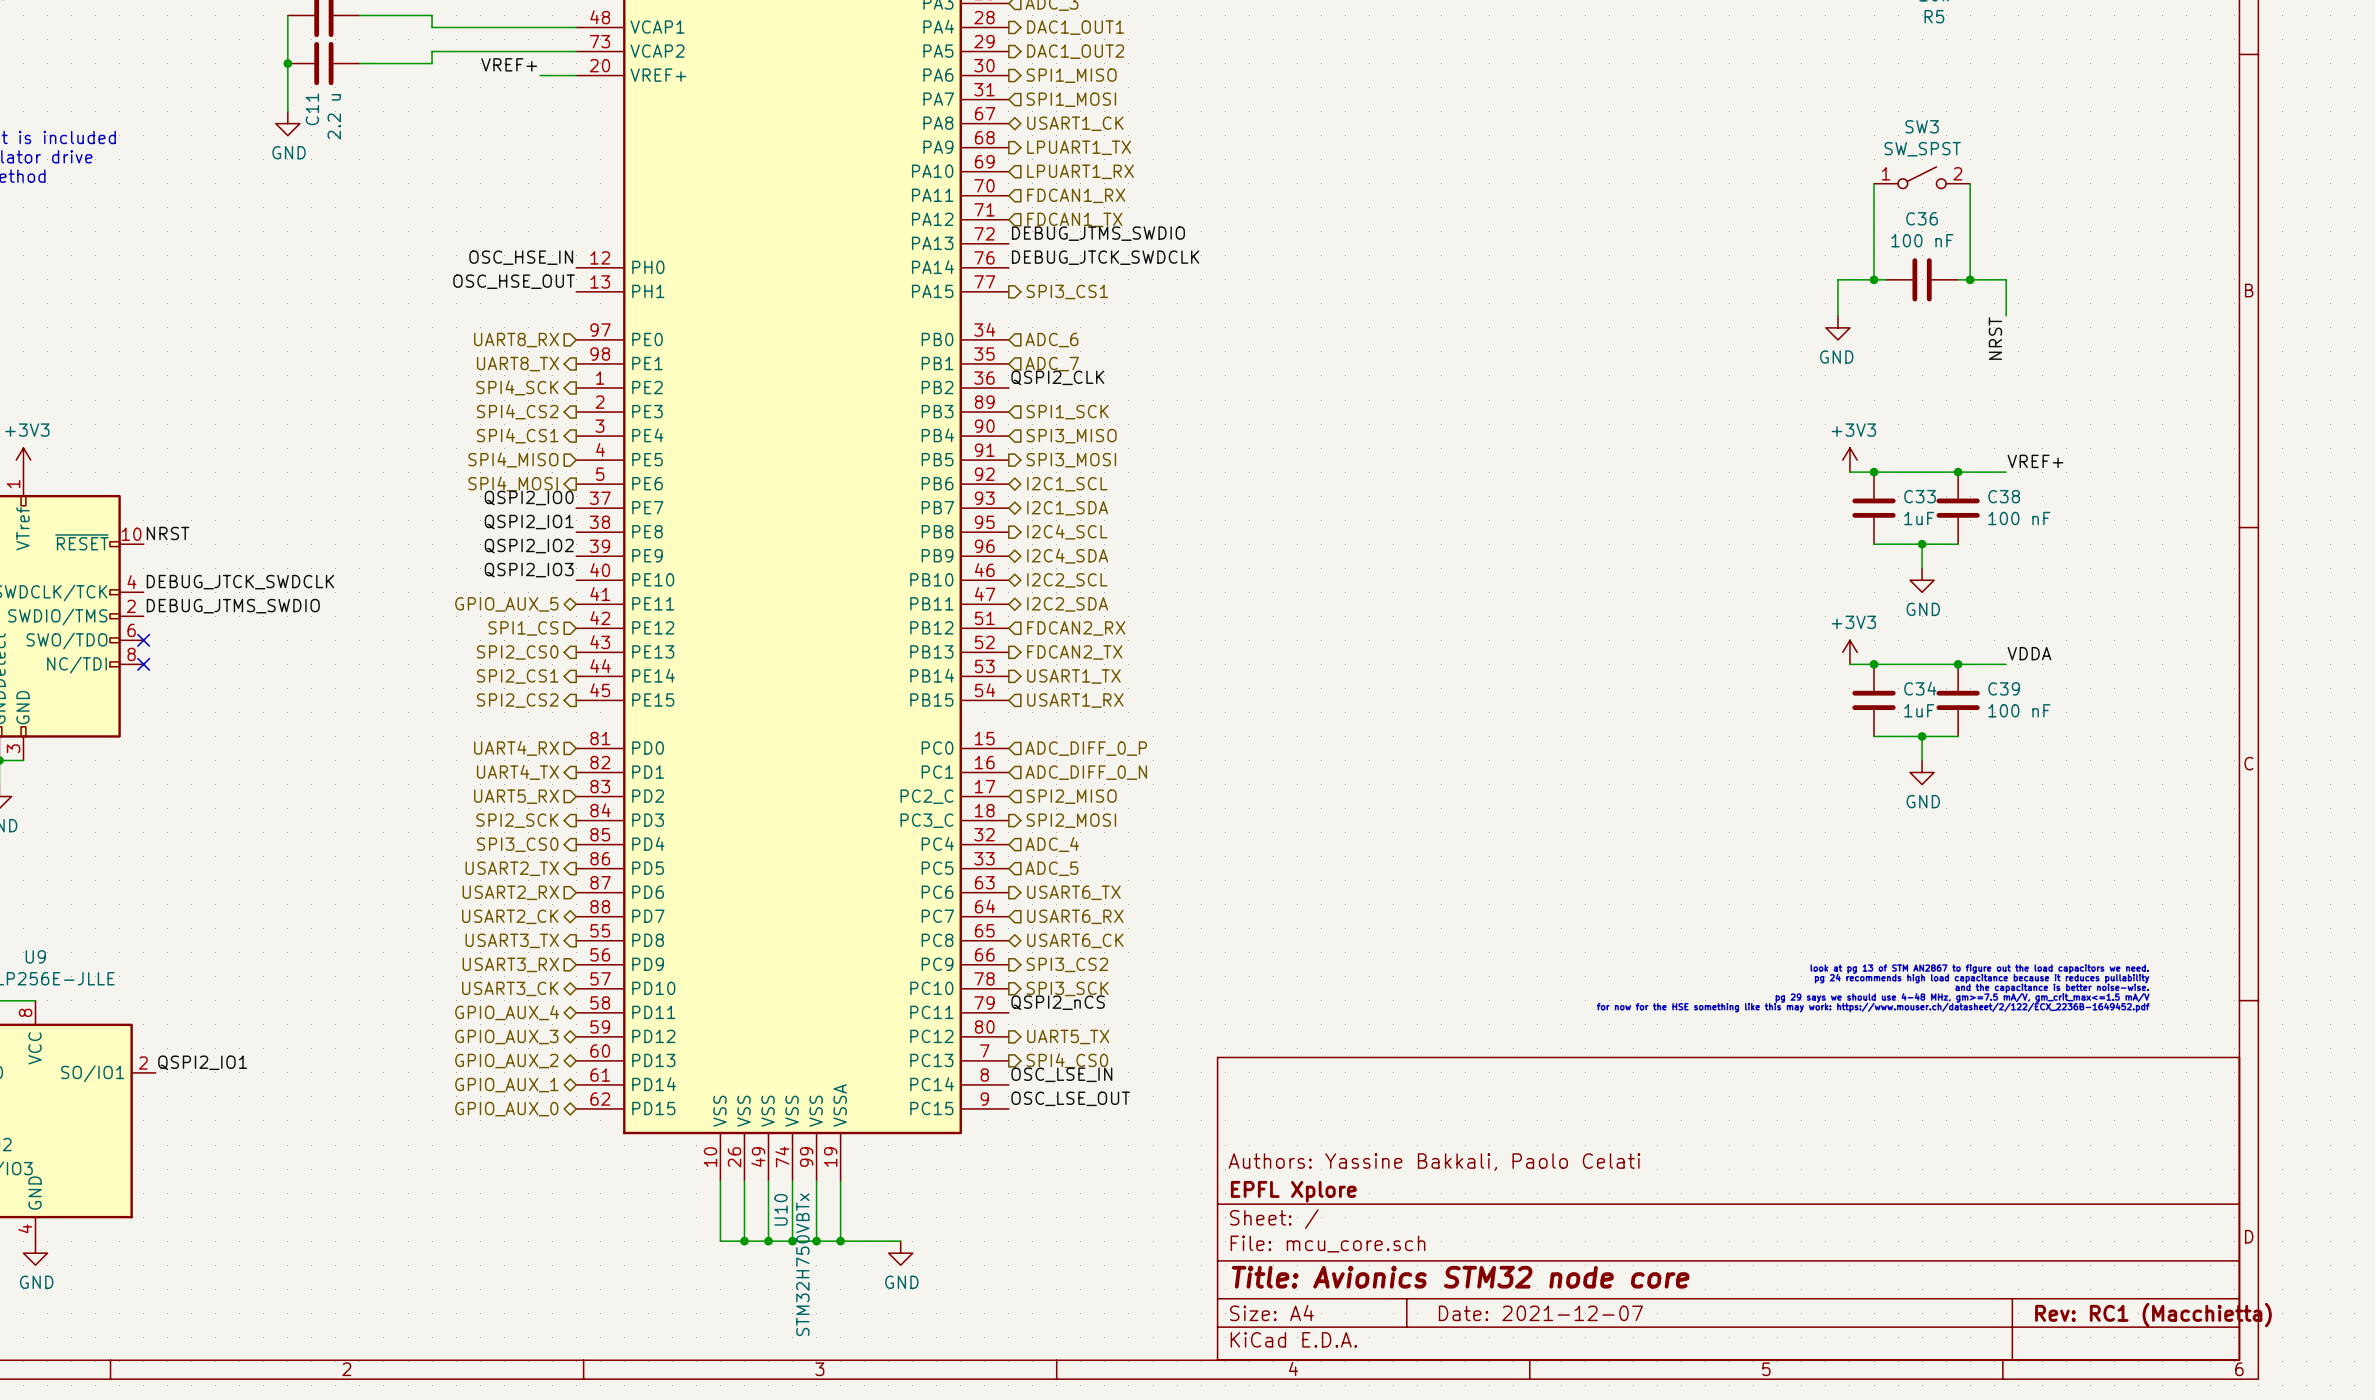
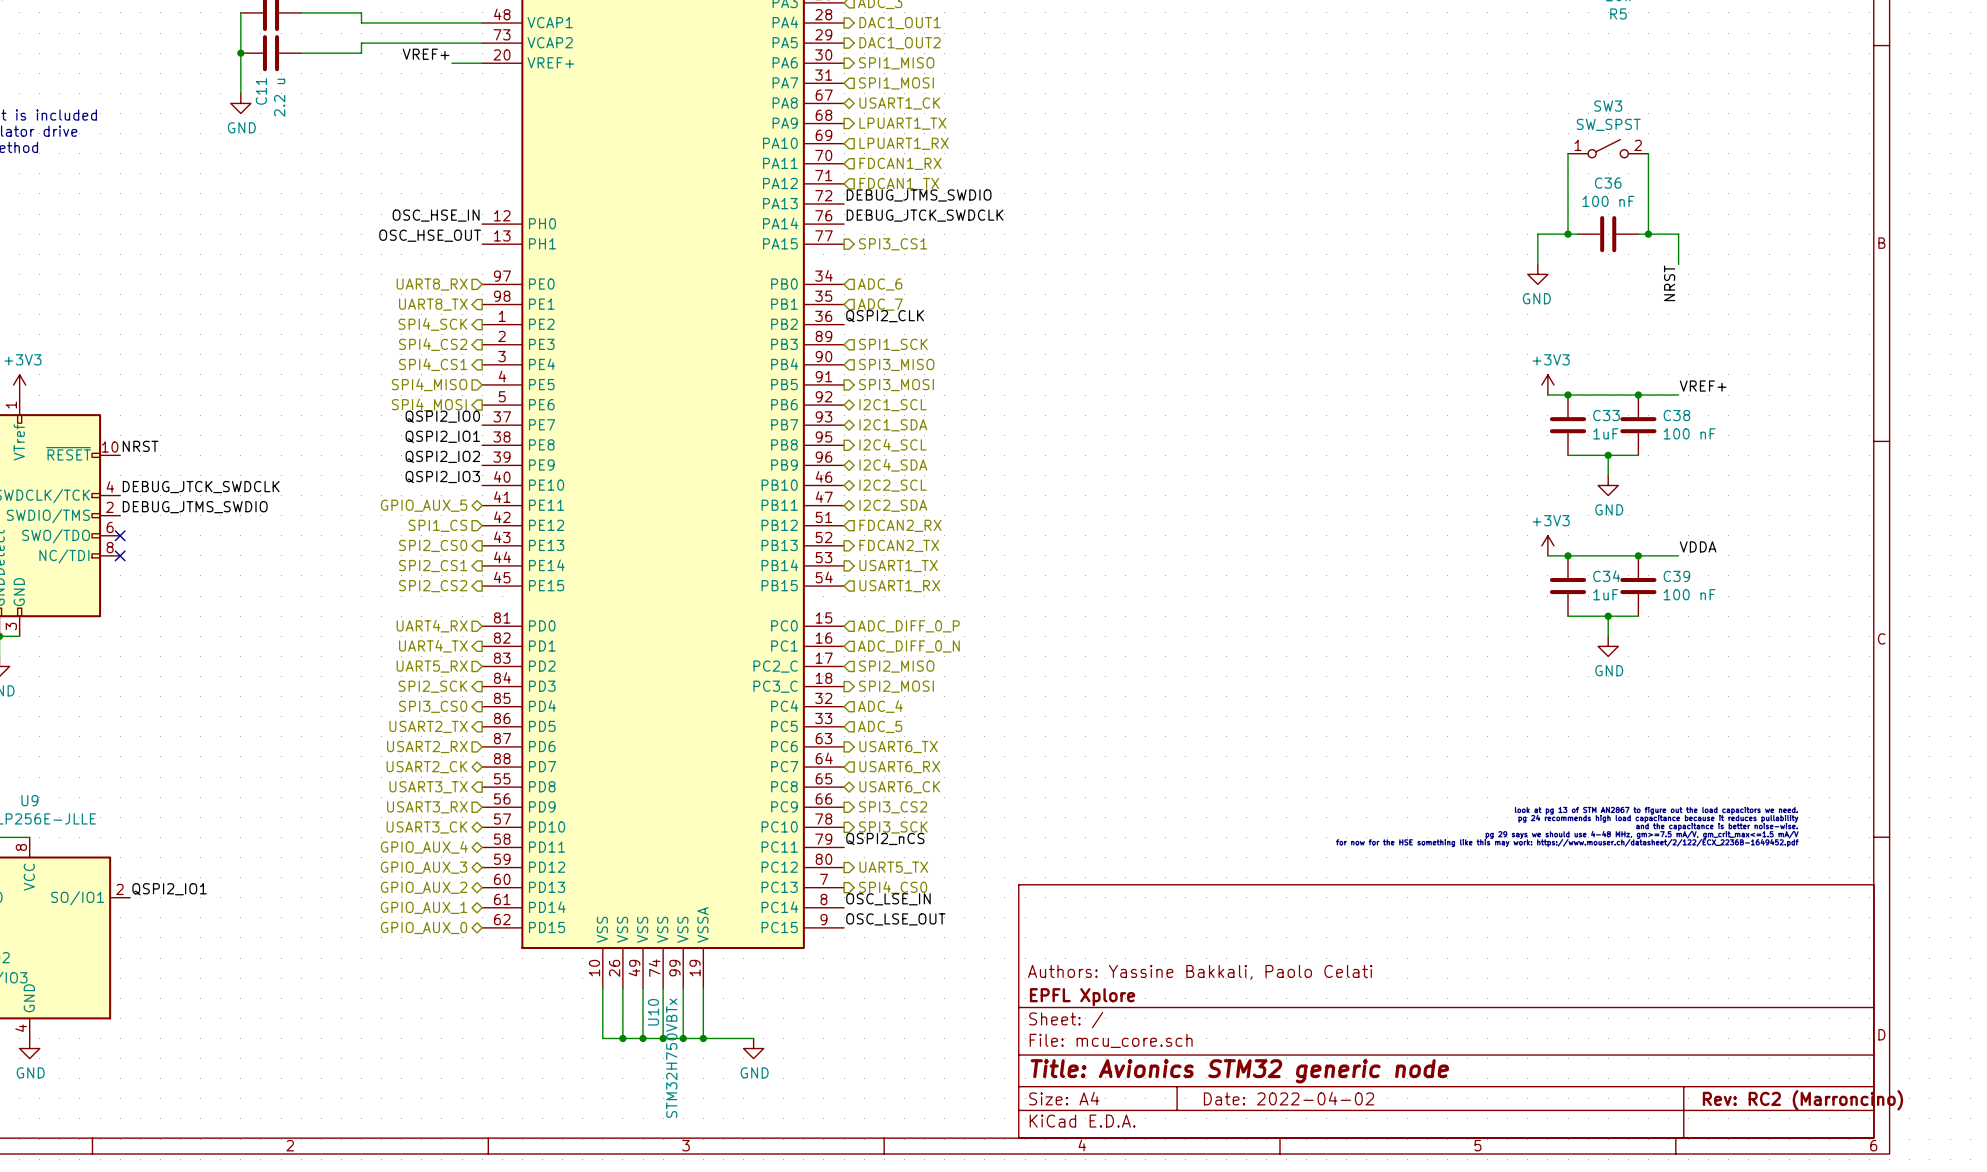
title block: Title: Avionics STM32 node core (1460, 1277) -> Title: Avionics STM32 generic node (1239, 1071)
title block: Date: 2021-12-07 (1540, 1313) -> Date: 2022-04-02 (1289, 1098)
title block: Rev: RC1 (Macchietta) (2153, 1315) -> Rev: RC2 (Marroncino) (1802, 1100)

